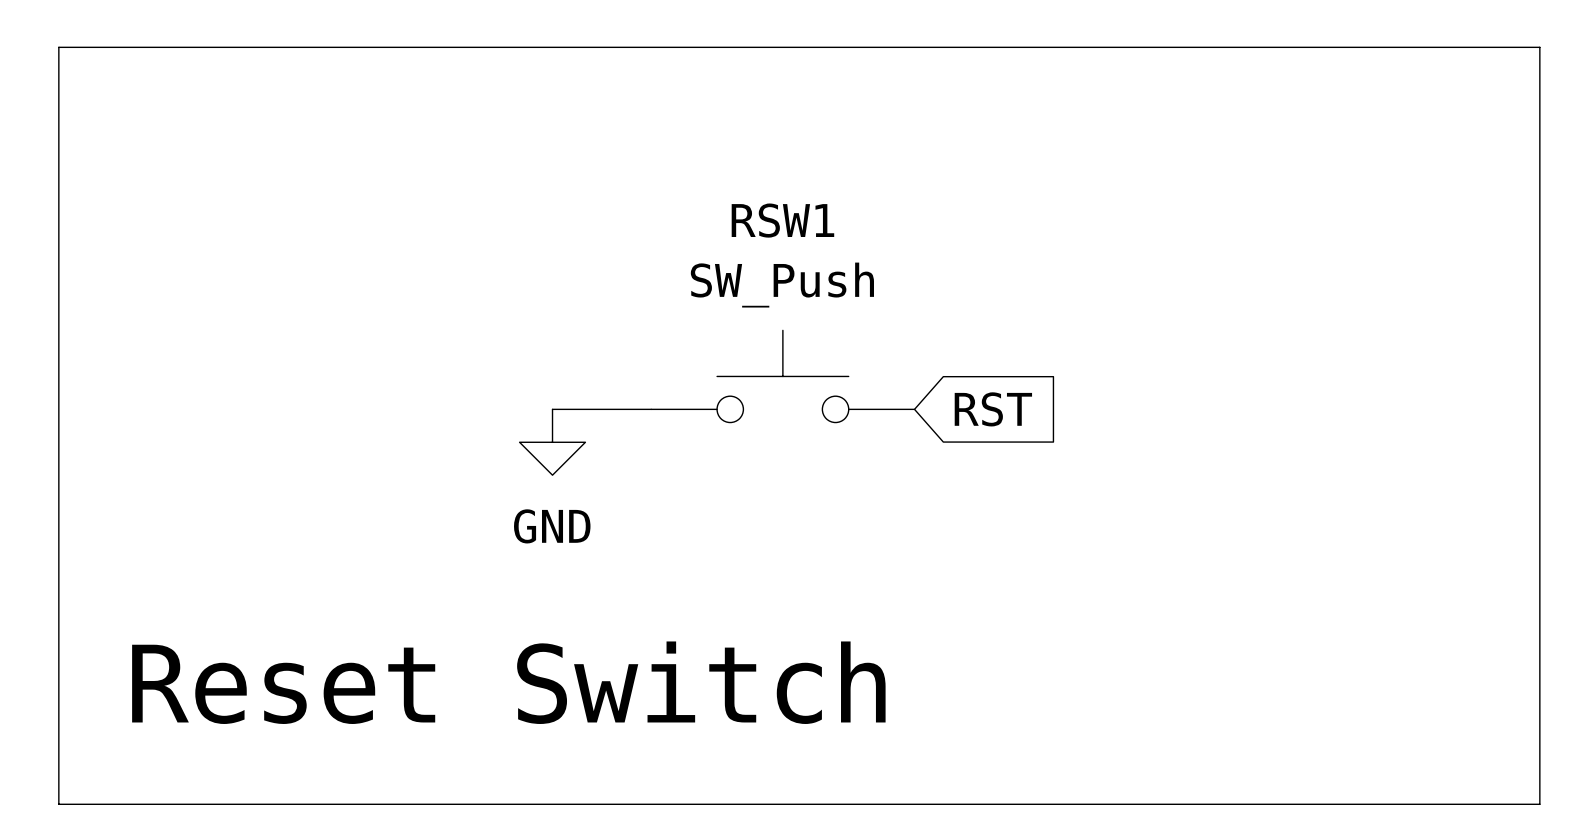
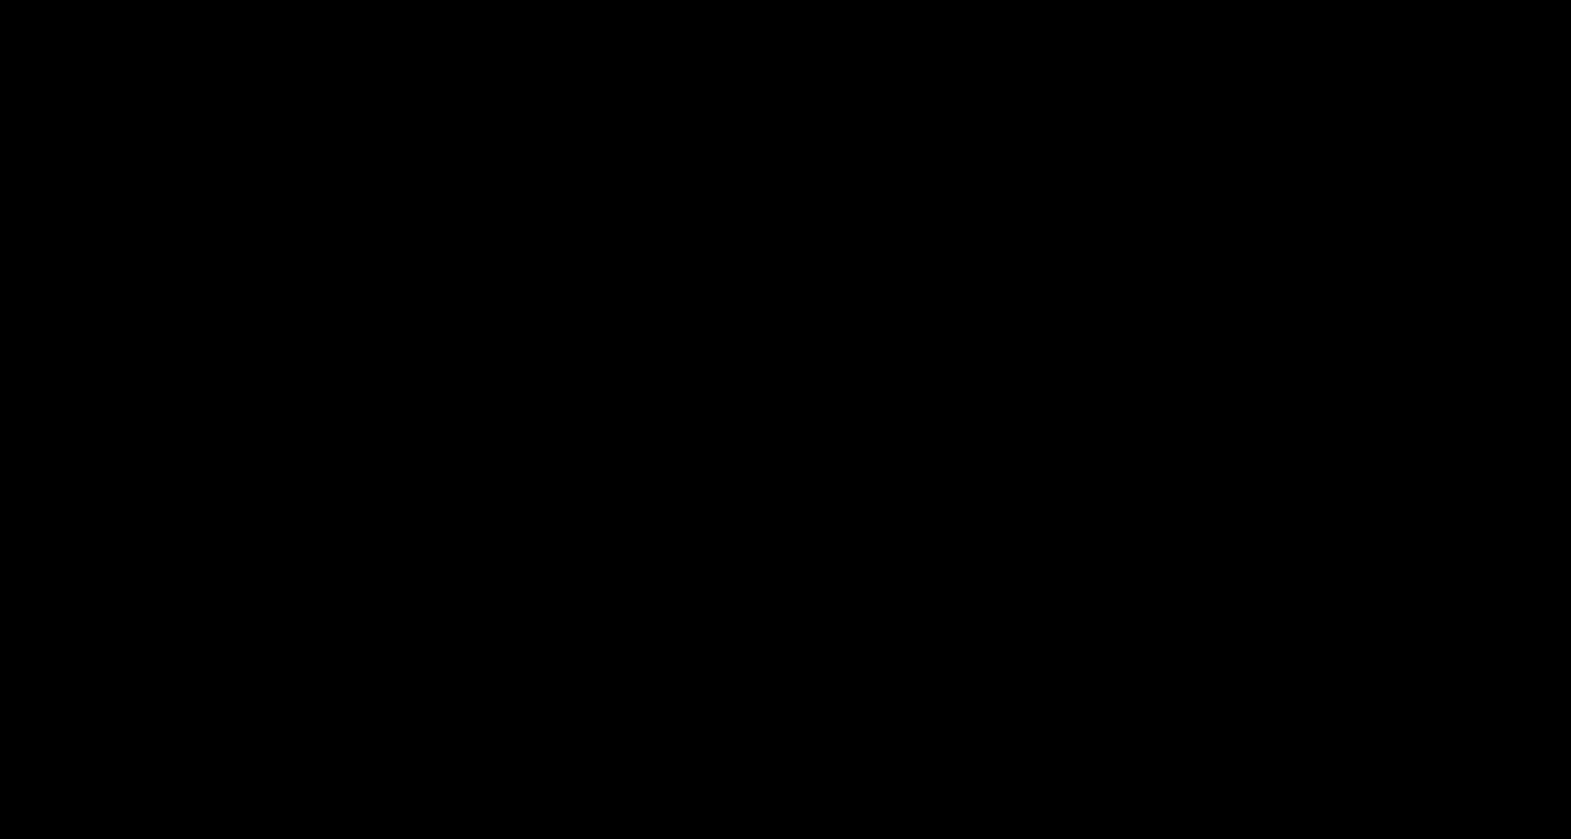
line: (58, 47) (1539, 47) (1539, 804) (58, 804) (58, 47) -> none
RSW1: SW_Push (782, 376) -> none
wire: (552, 409) (651, 409) -> none
global label: RST (993, 409) -> none
power symbol: GND (552, 442) -> none
text: Reset Switch (508, 682) -> none

